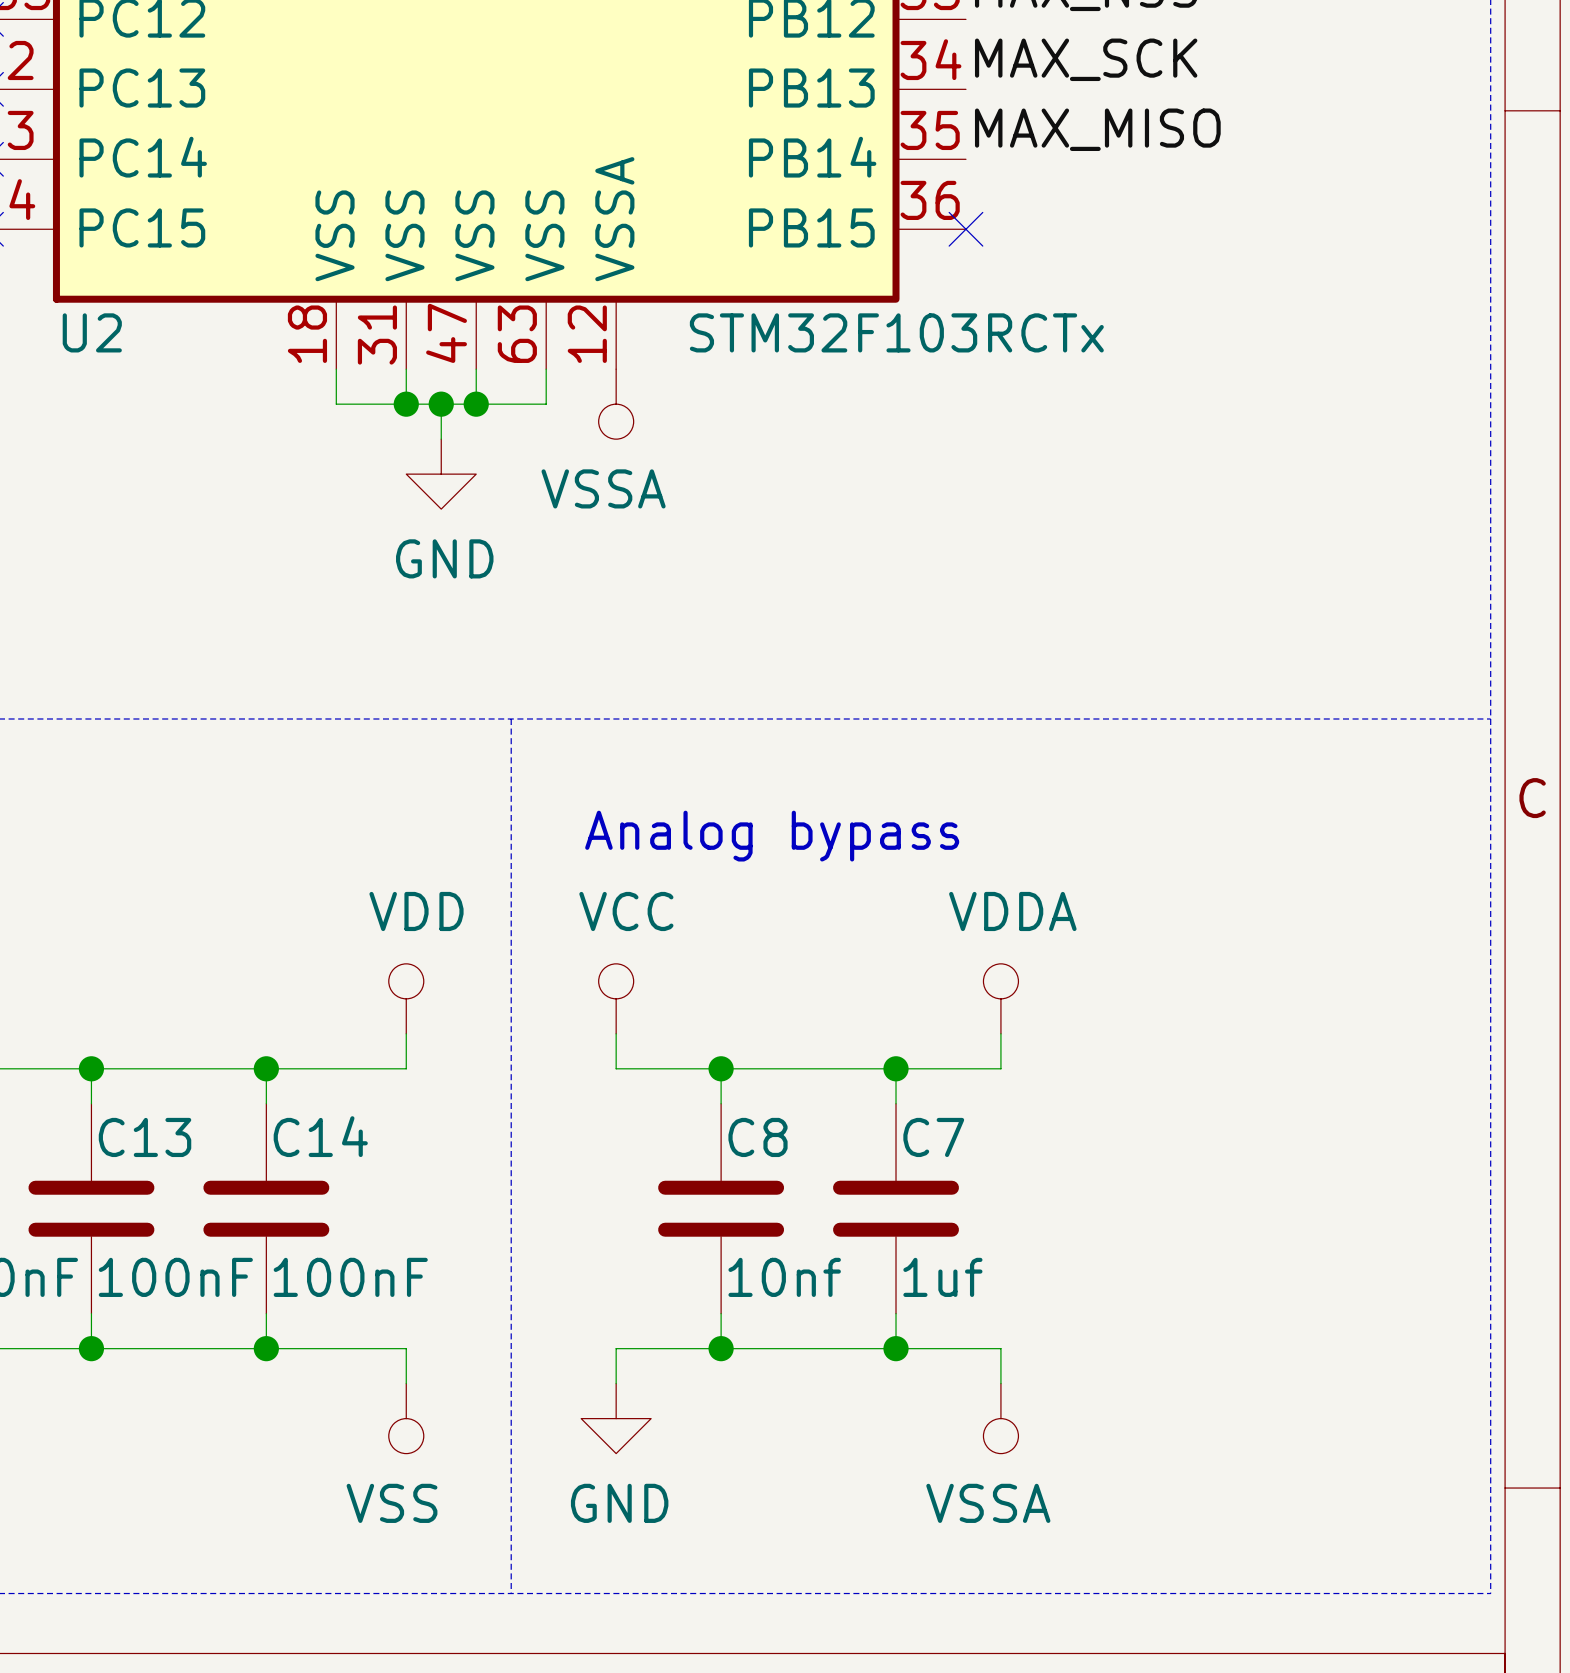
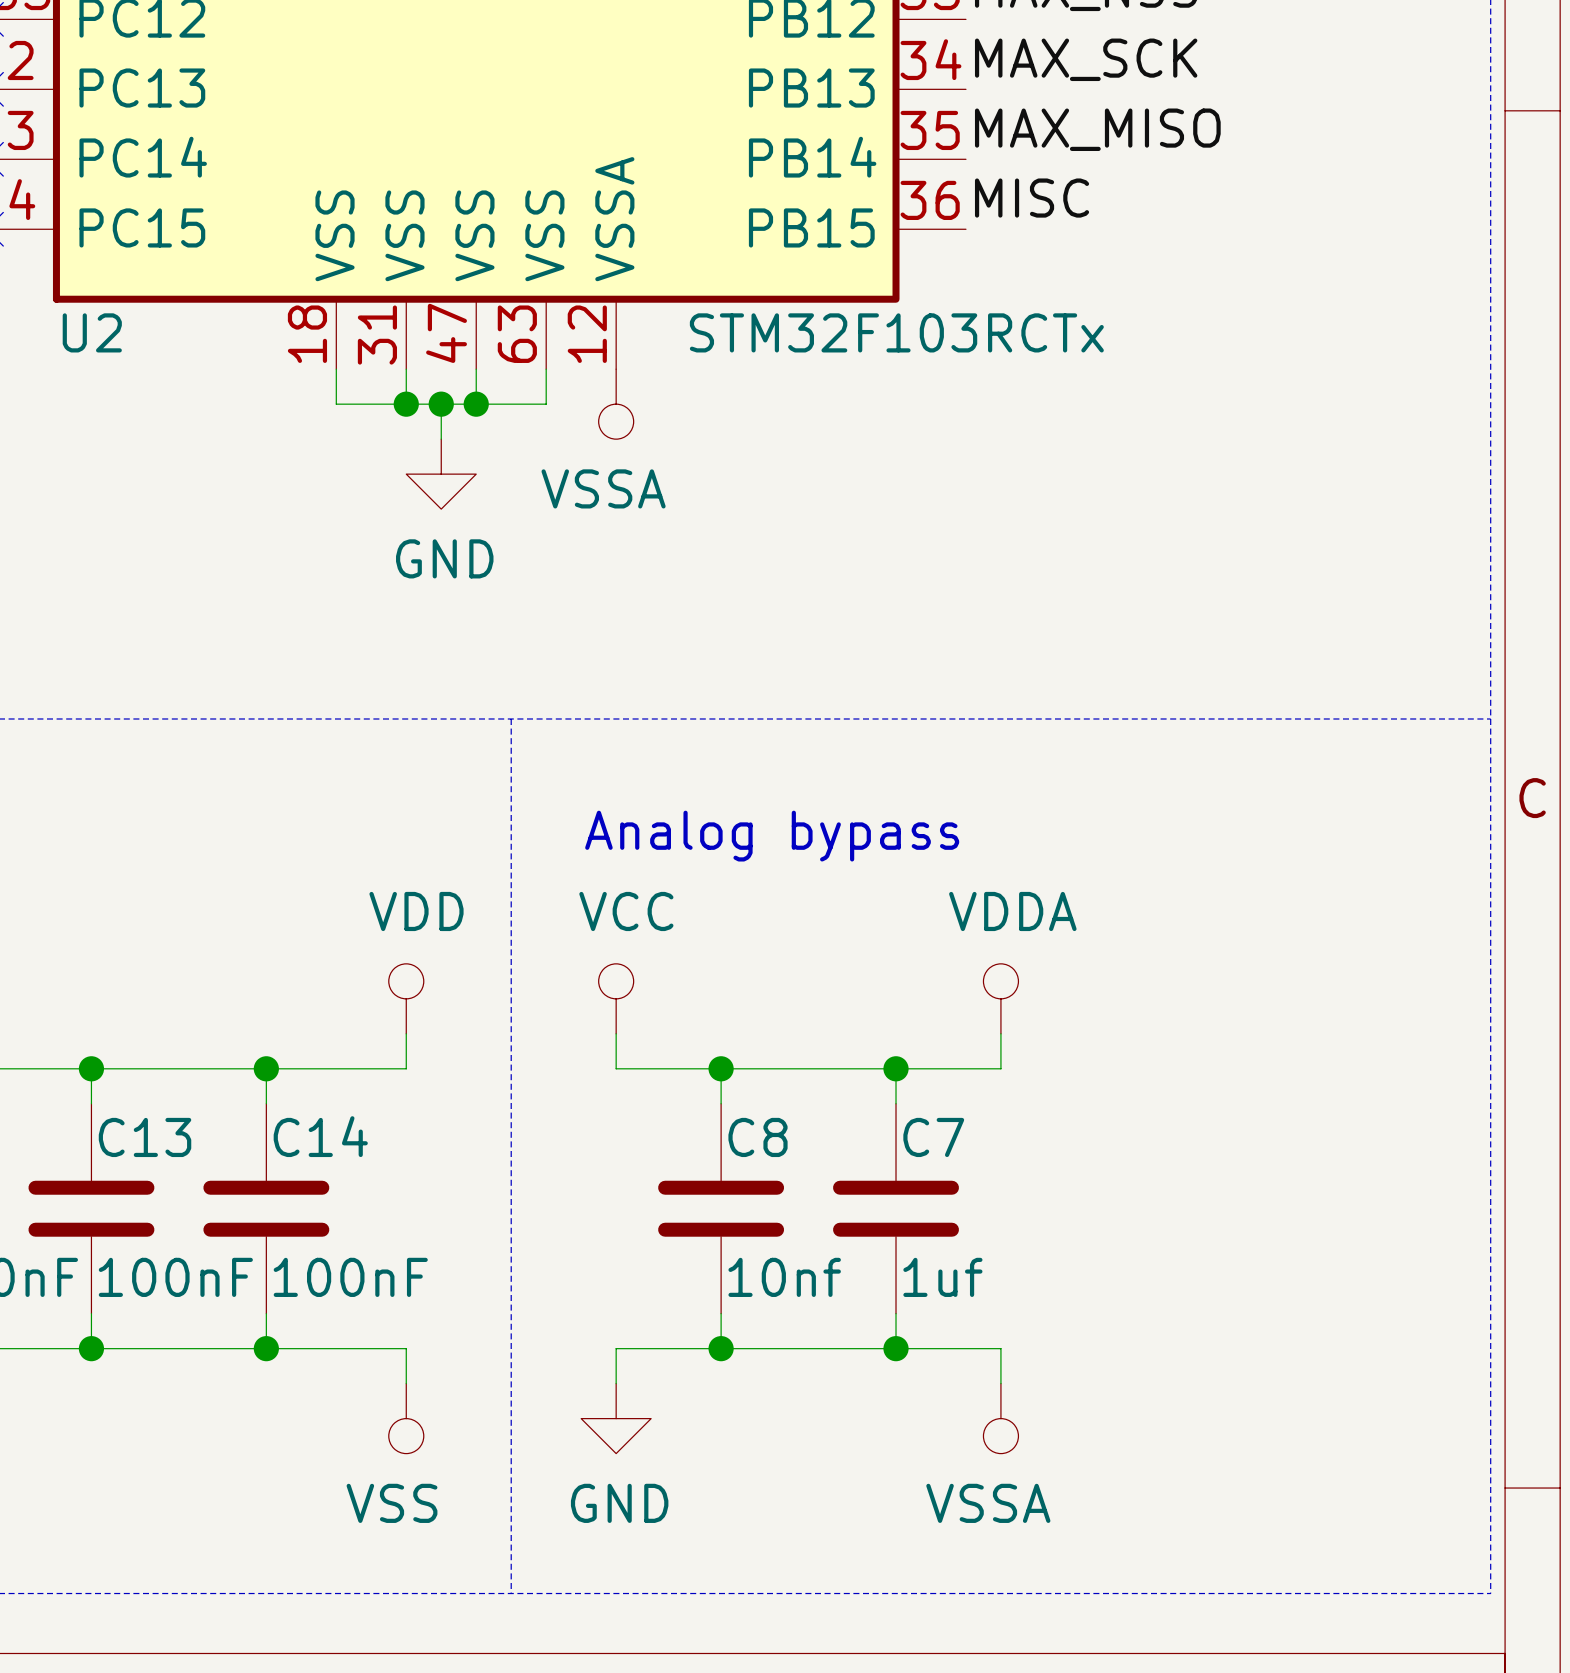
label: none -> MISC (1032, 198)
no-connect mark: (965, 229) -> none

